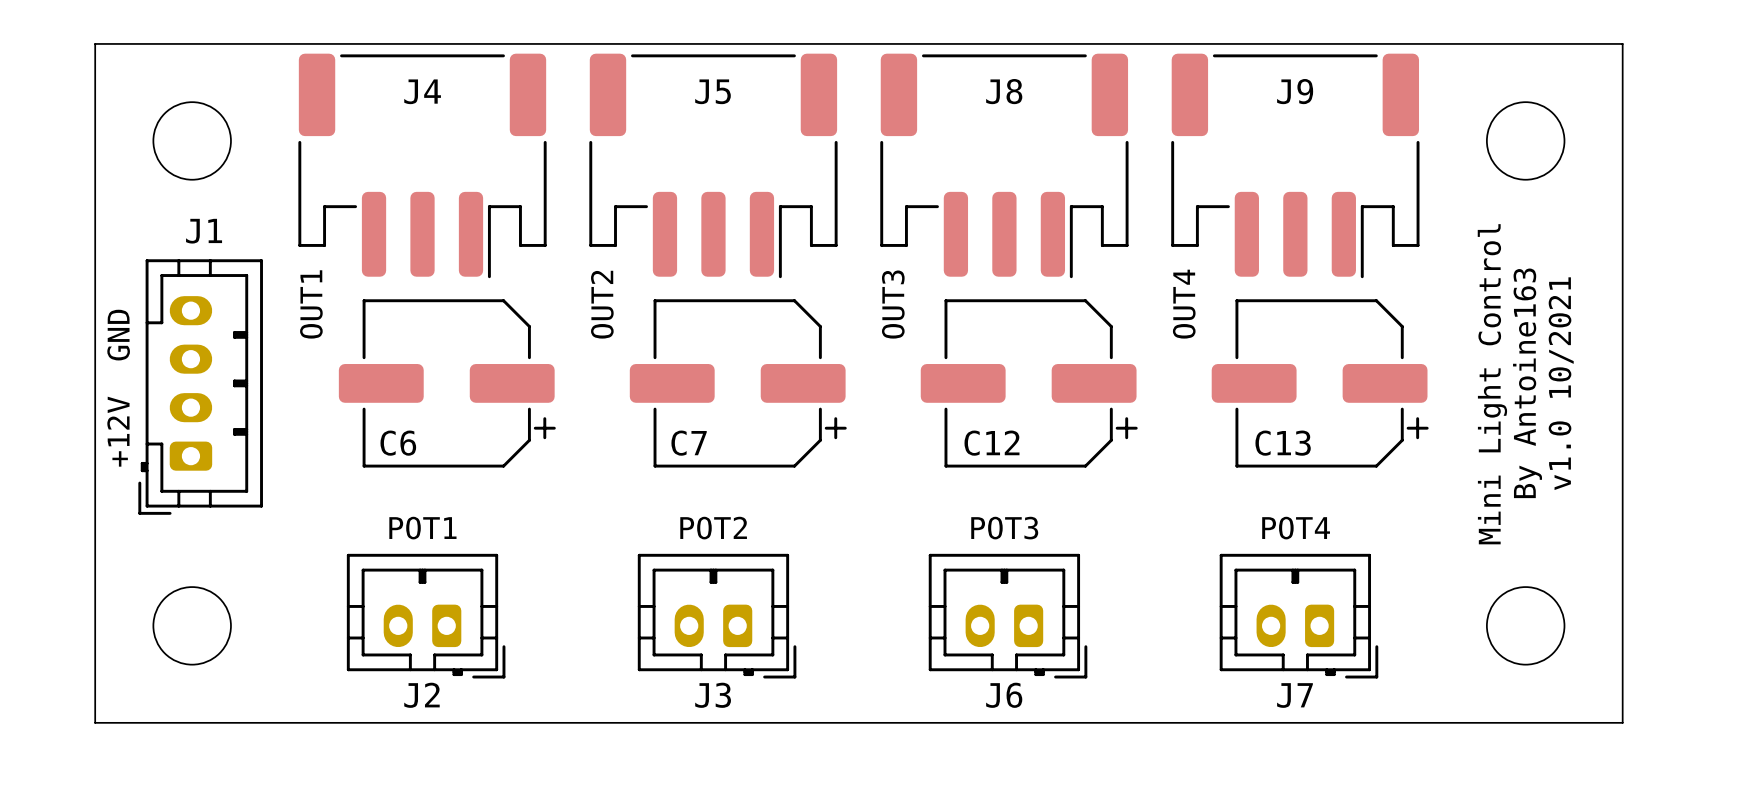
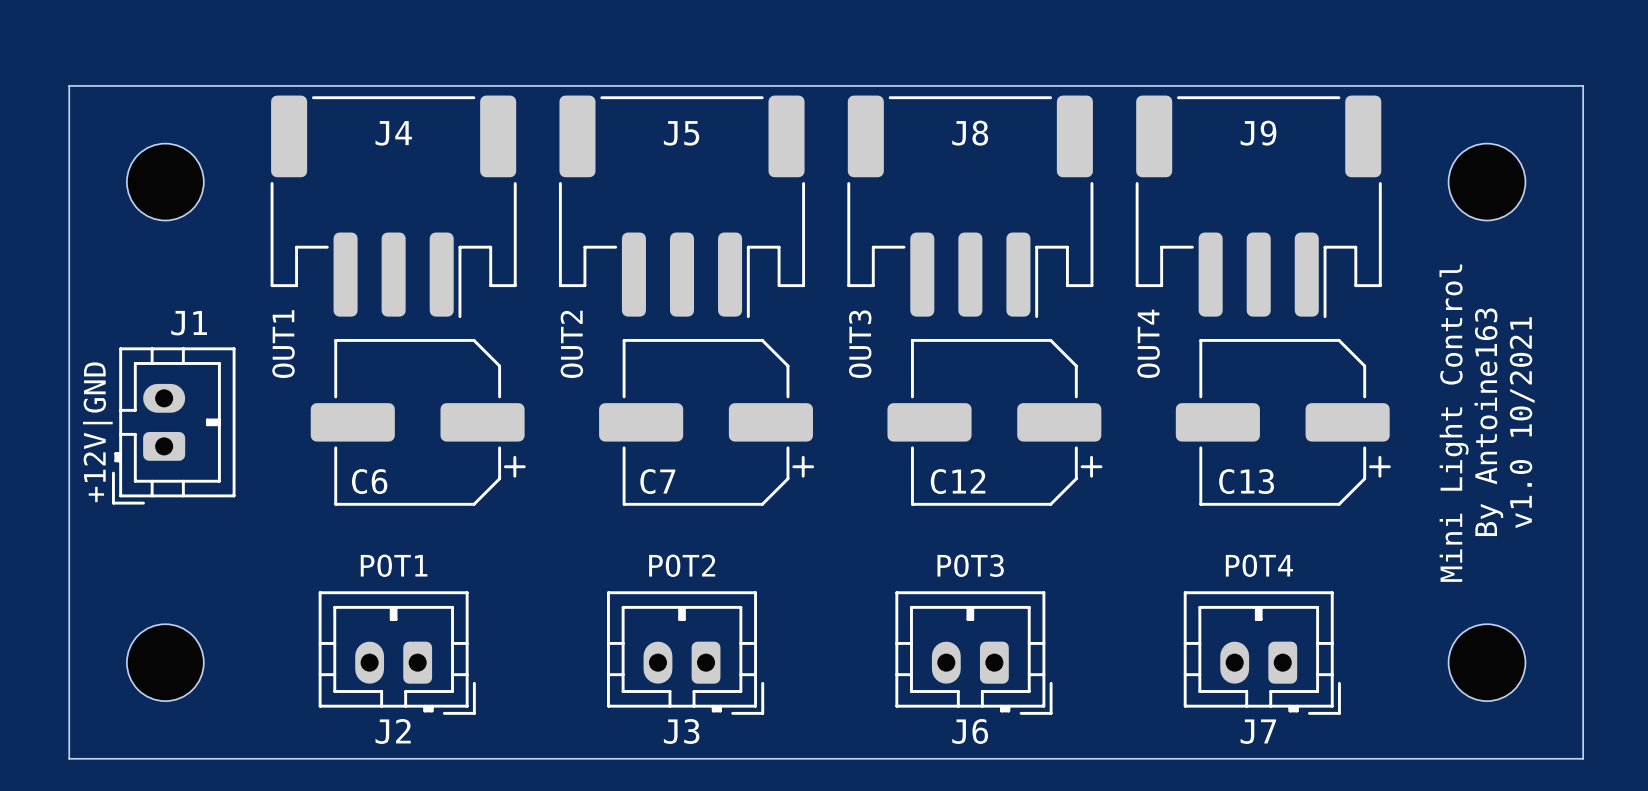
J1 name position: J1 (204, 231) -> J1 (189, 323)
J1 footprint: [138, 259, 263, 515] -> [112, 347, 236, 505]
text: GND (118, 335) -> none
text: +12V (118, 431) -> +12V|GND (97, 432)

